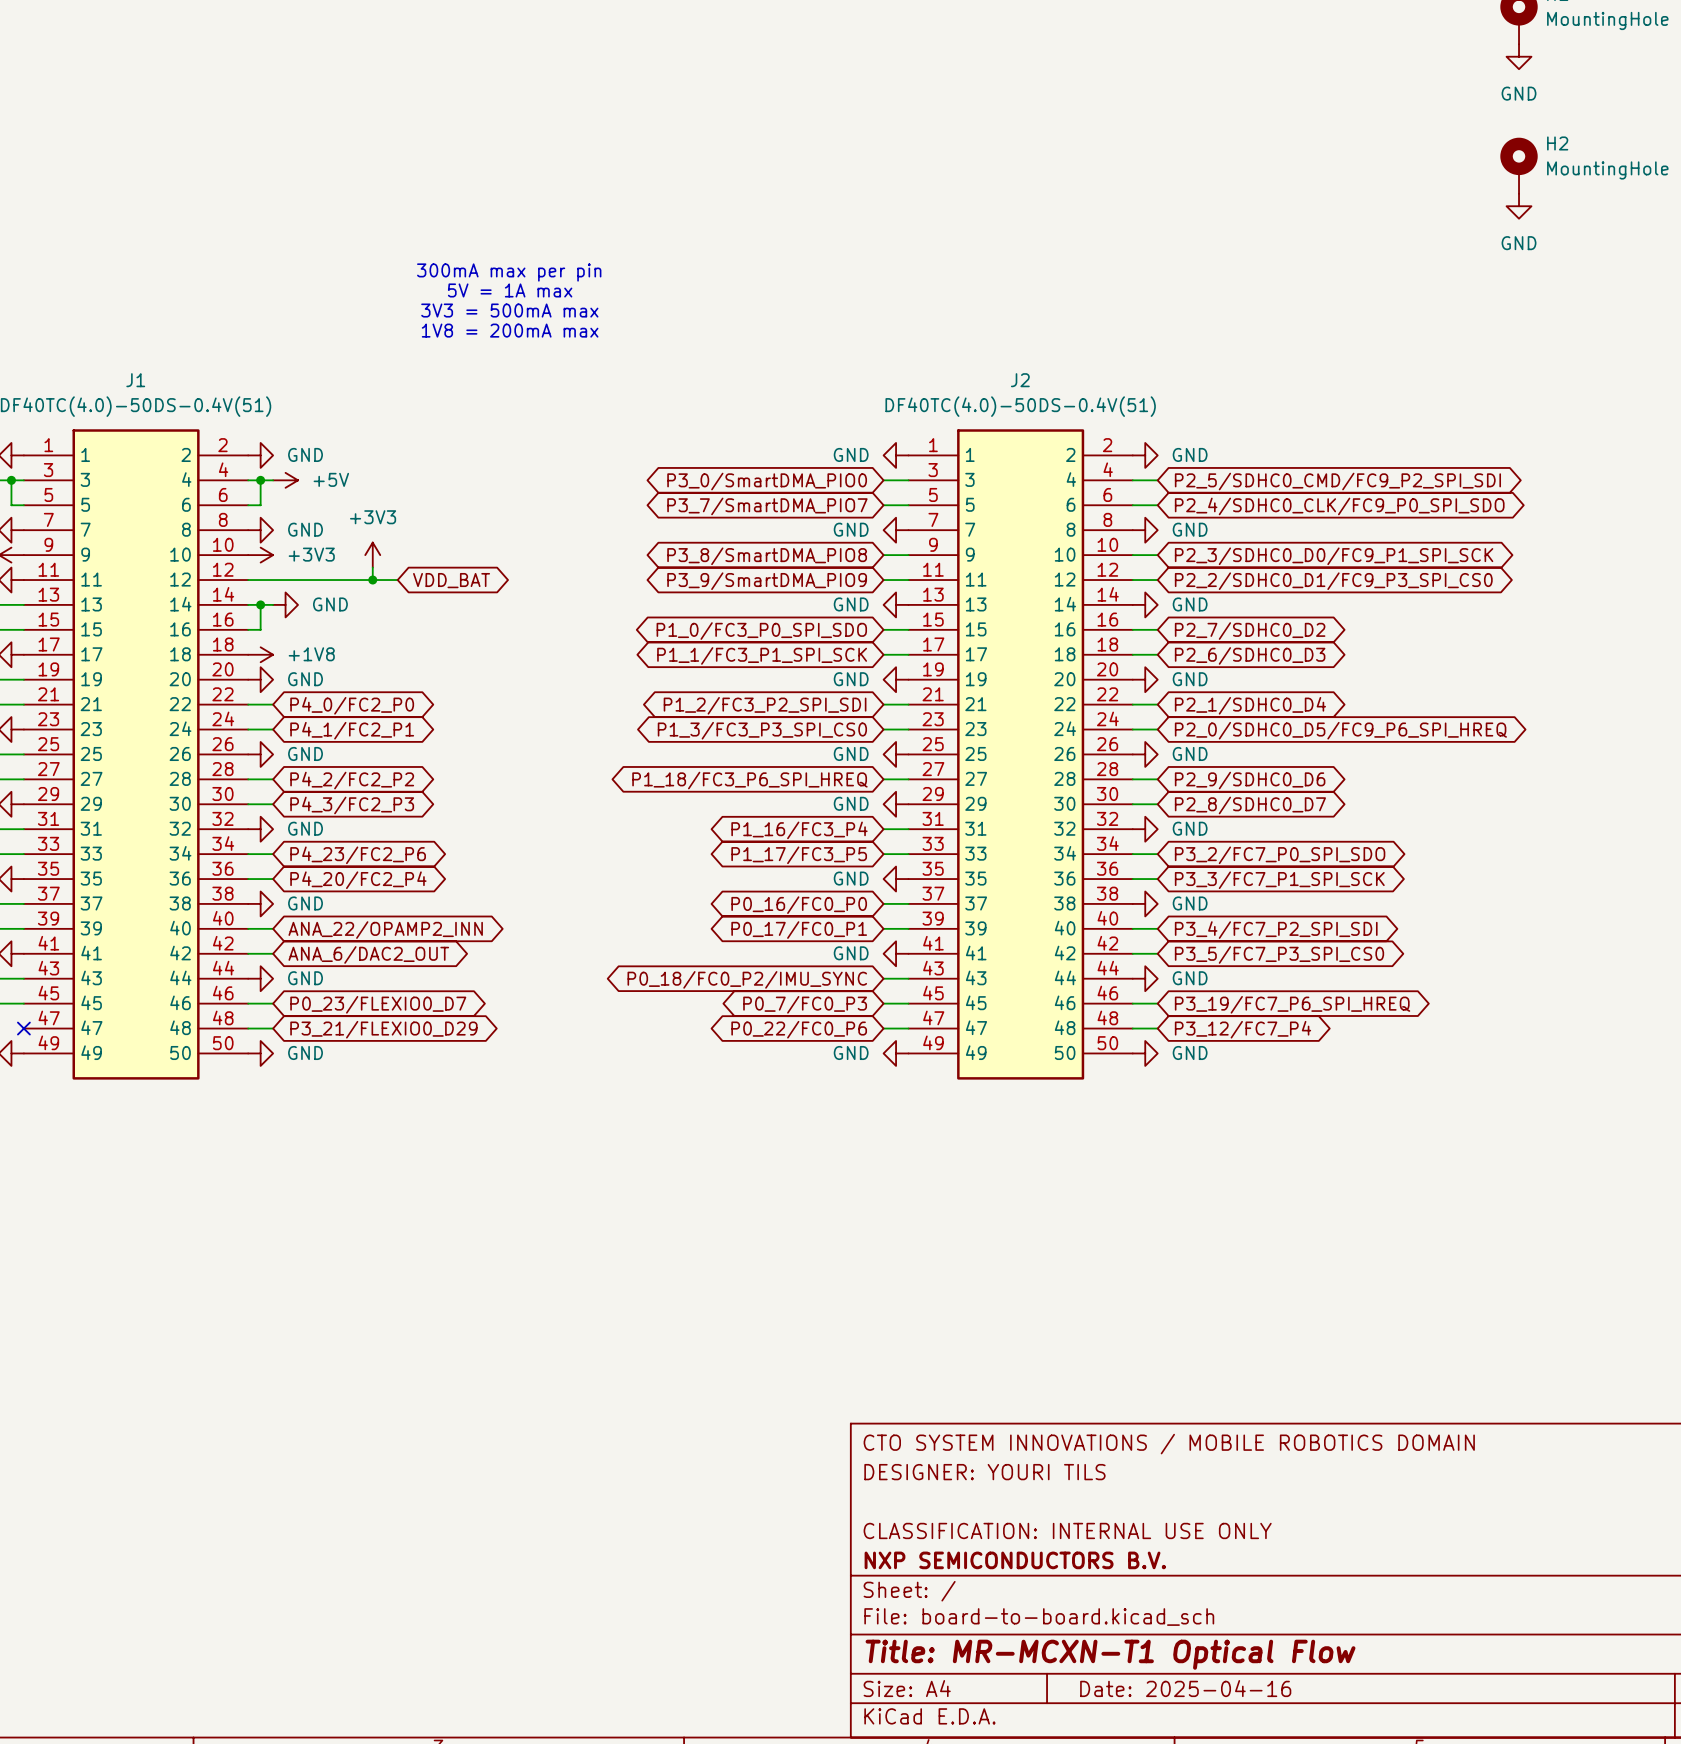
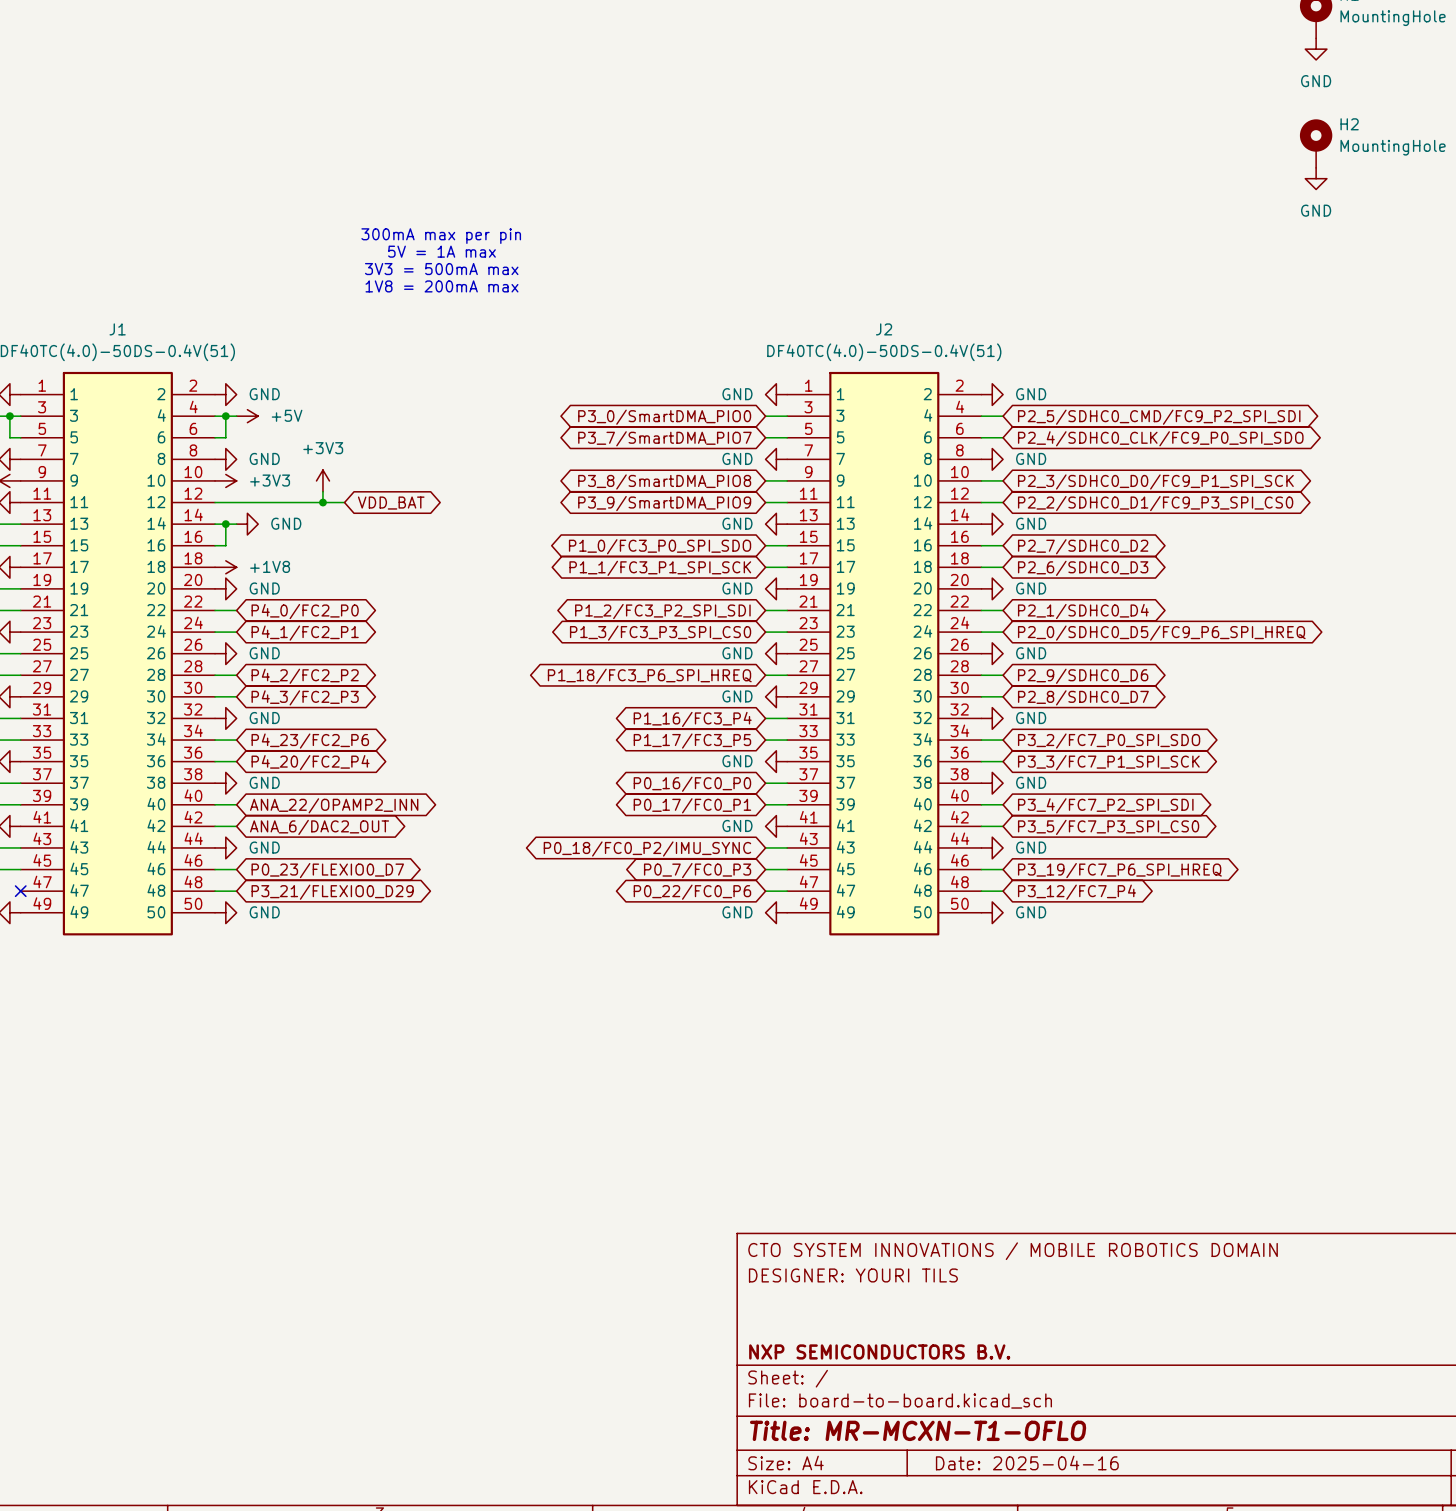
title block: CLASSIFICATION: INTERNAL USE ONLY (1067, 1530) -> none
title block: Title: MR-MCXN-T1 Optical Flow (1110, 1654) -> Title: MR-MCXN-T1-OFLO (918, 1430)

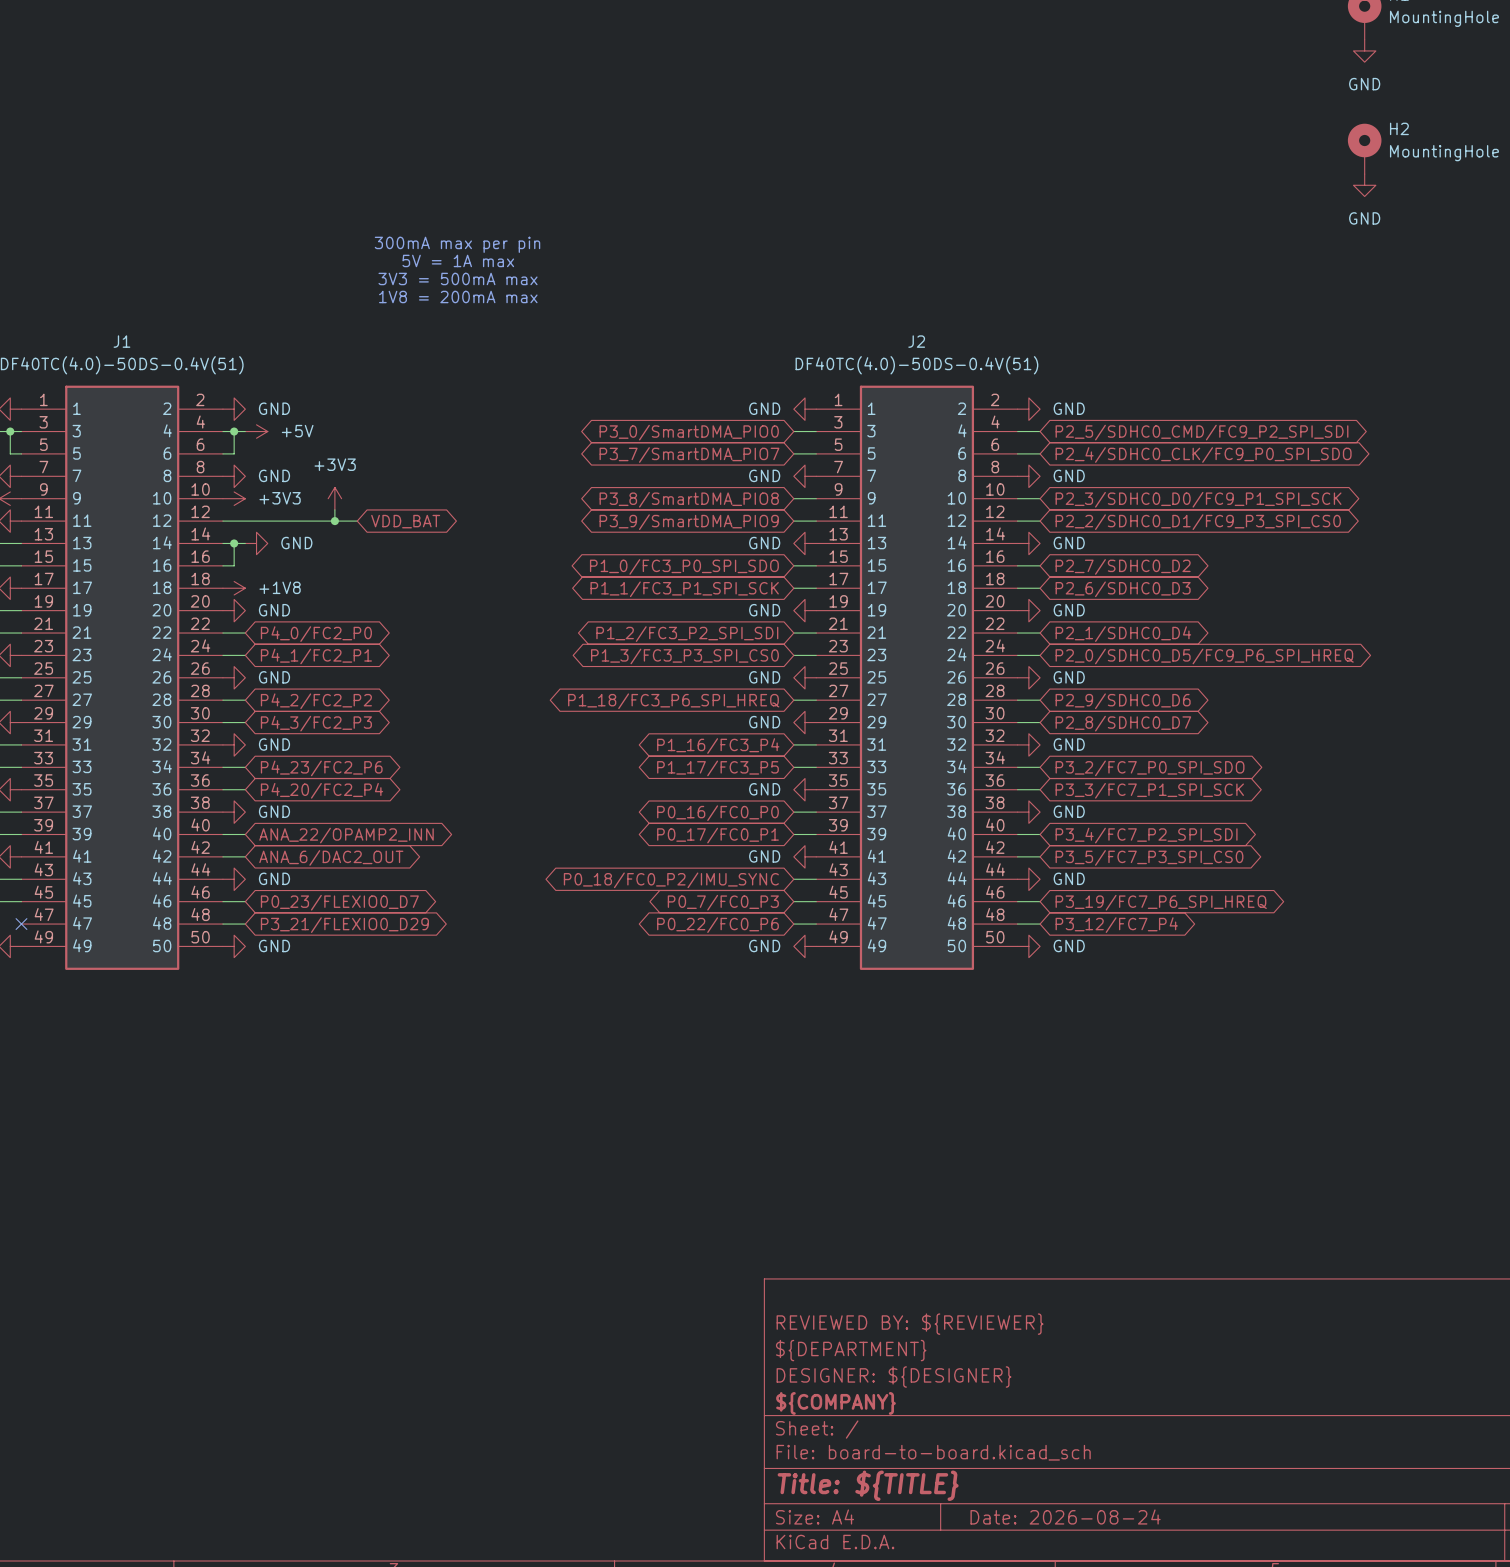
title block: CTO SYSTEM INNOVATIONS / MOBILE ROBOTICS DOMAIN (1013, 1251) -> none
title block: DESIGNER: YOURI TILS (853, 1275) -> REVIEWED BY: ${REVIEWER} (910, 1324)
title block: none -> ${DEPARTMENT} (851, 1350)
title block: none -> DESIGNER: ${DESIGNER} (894, 1376)
title block: NXP SEMICONDUCTORS B.V. (879, 1351) -> ${COMPANY} (836, 1403)
title block: Title: MR-MCXN-T1-OFLO (918, 1430) -> Title: ${TITLE} (868, 1485)
title block: Date: 2025-04-16 (1027, 1463) -> Date: 2026-08-24 (1065, 1517)

